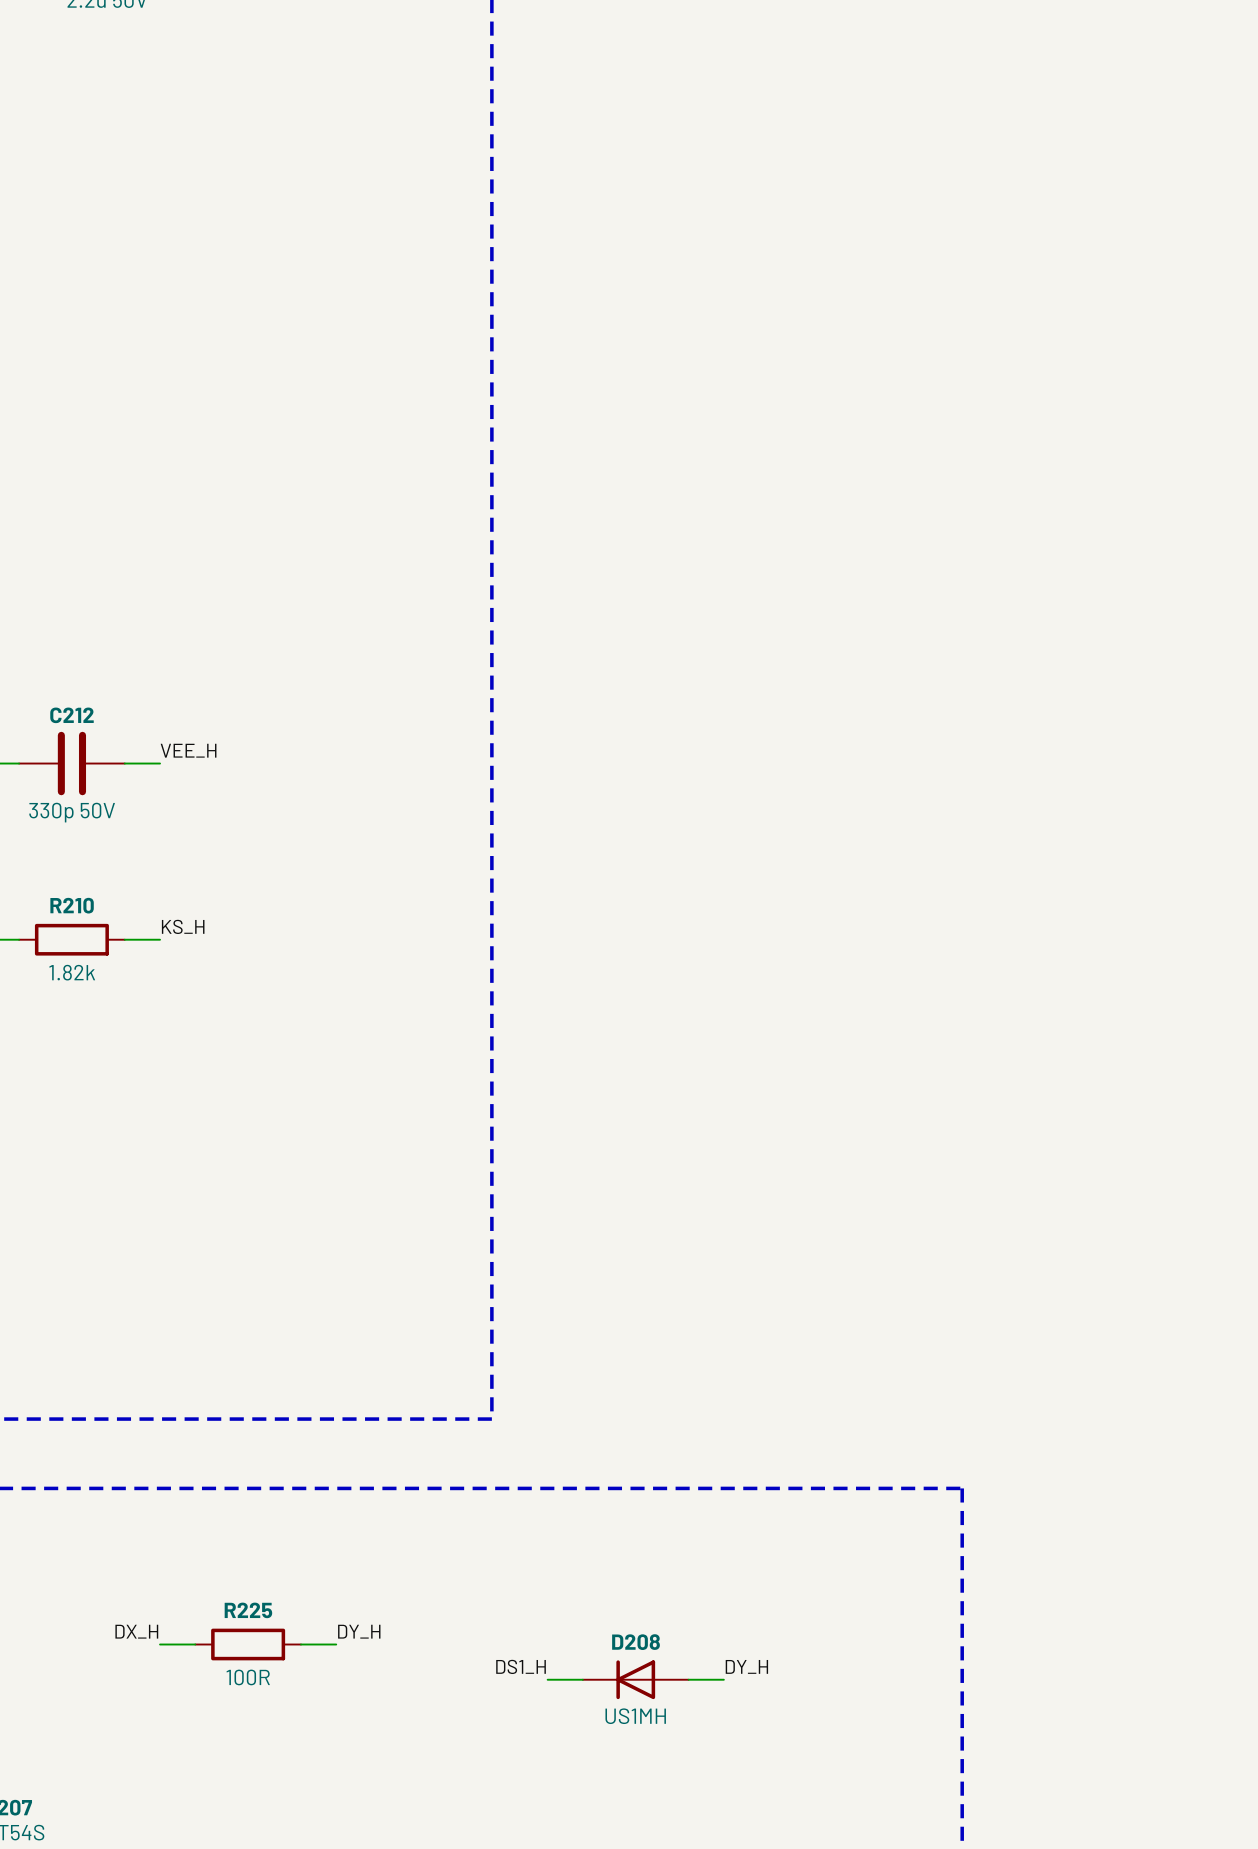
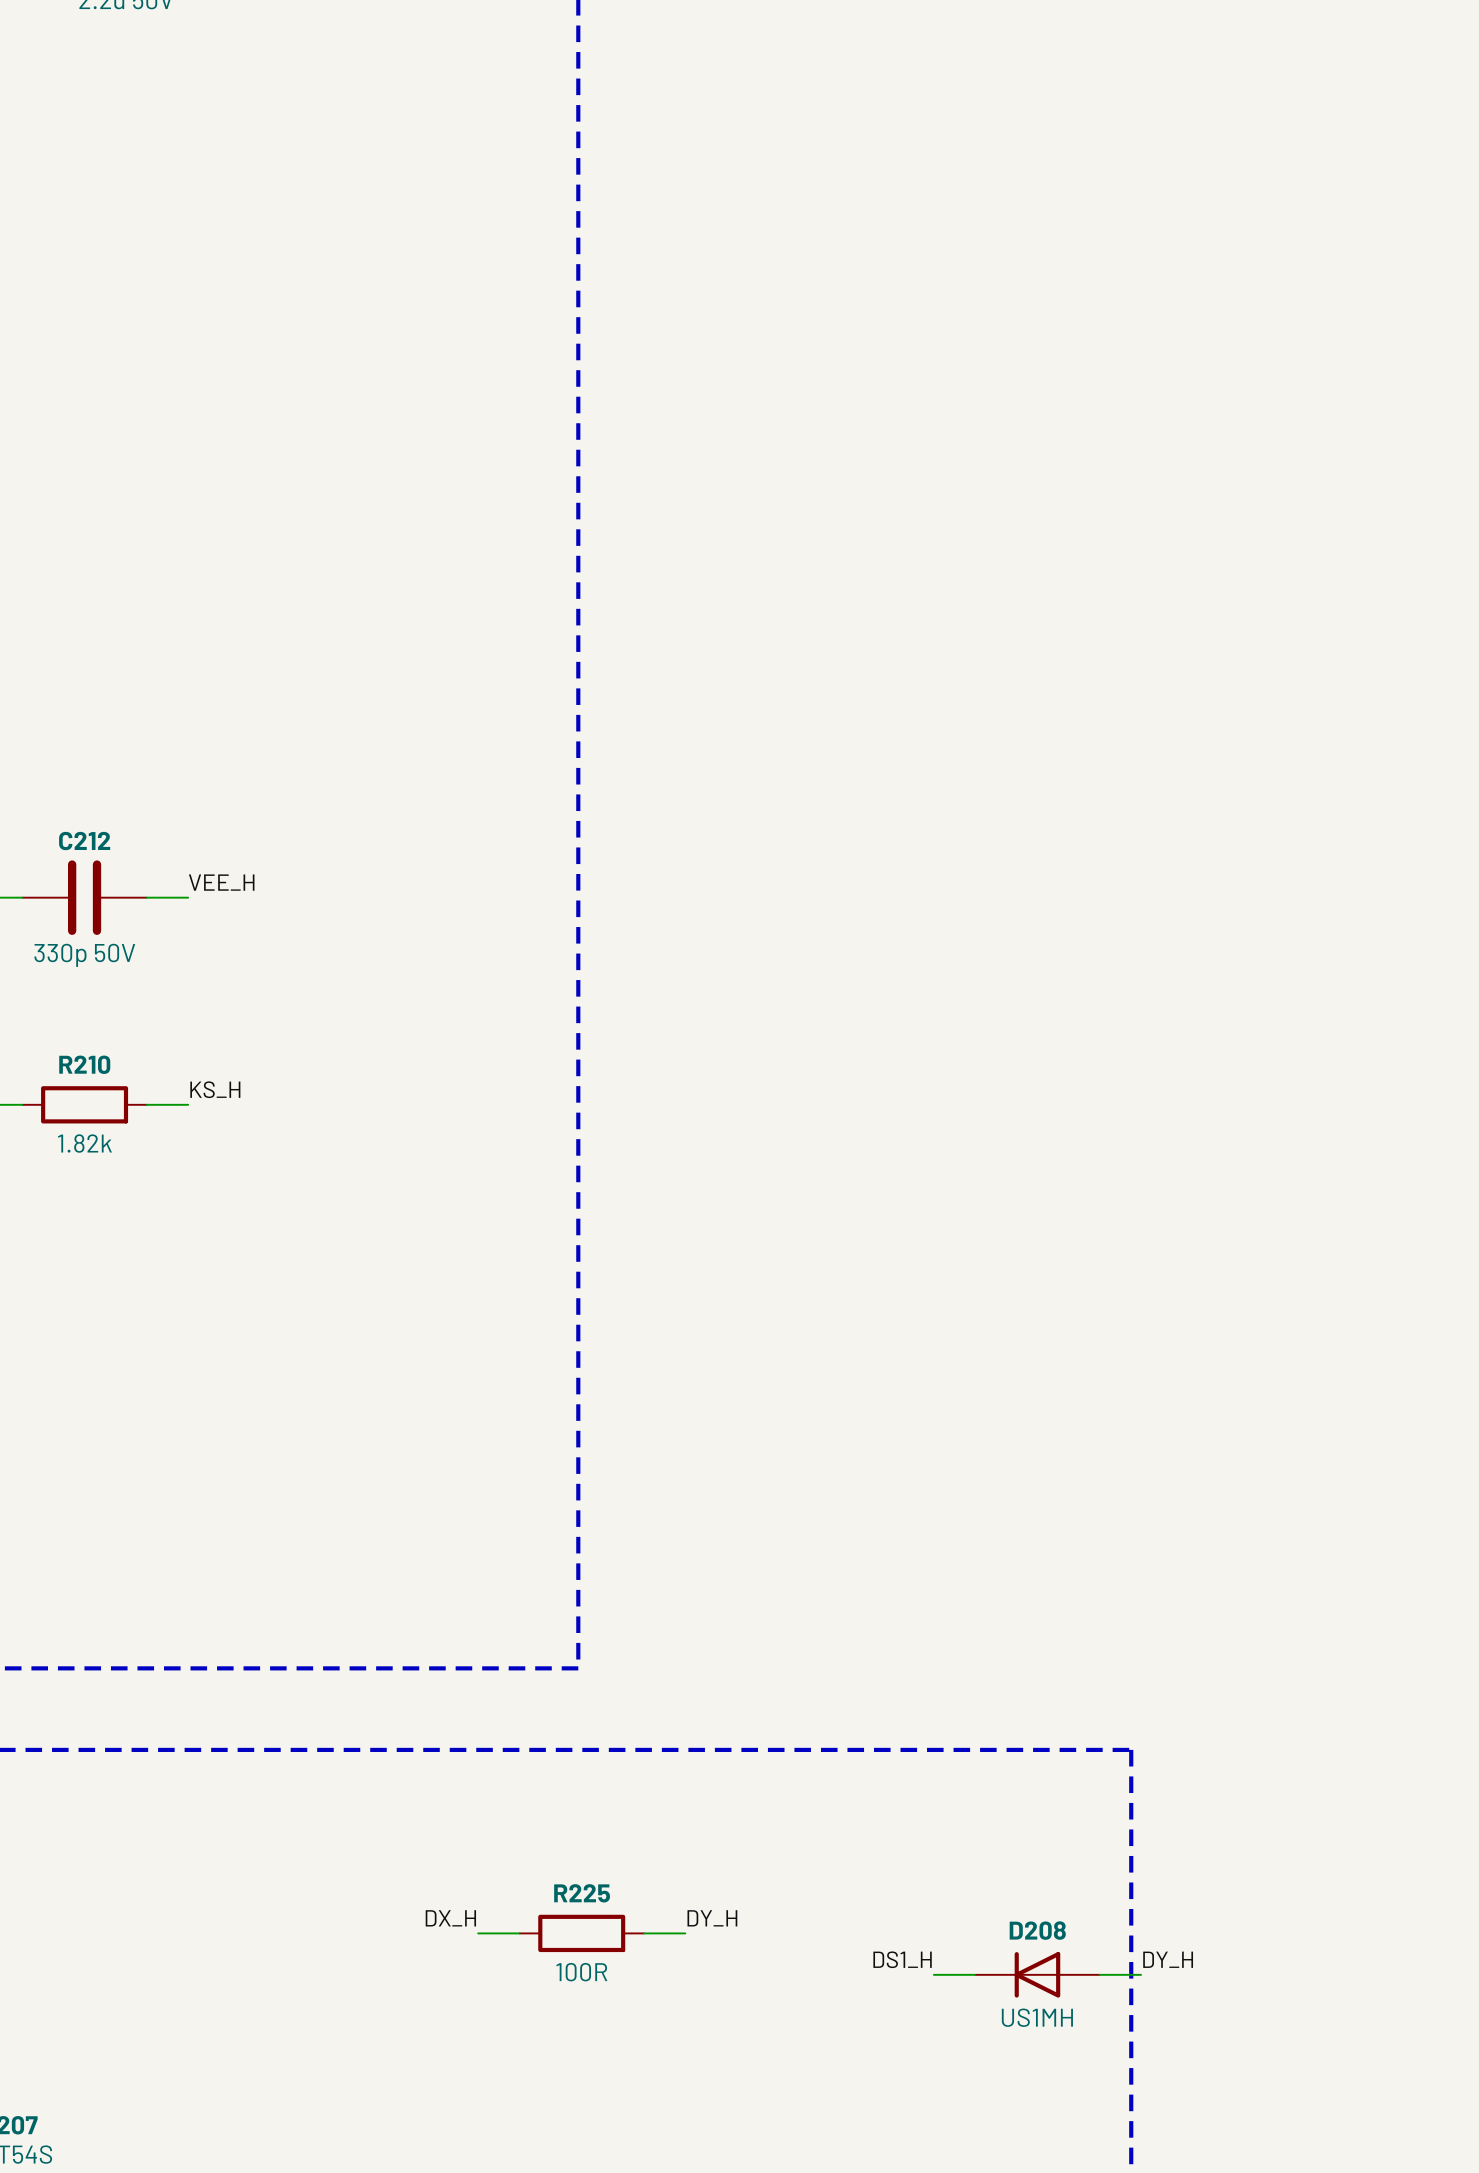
label position: DX_H (136, 1631) -> DX_H (450, 1918)
label: DY_H (359, 1631) -> none
label: none -> DY_H (712, 1918)
wire: (160, 1644) (195, 1644) -> (478, 1933) (519, 1933)
R225 position: (248, 1644) -> (581, 1933)
wire: (300, 1644) (336, 1644) -> (643, 1933) (685, 1933)
label position: DS1_H (521, 1666) -> DS1_H (902, 1959)
label: DY_H (746, 1666) -> none
label: none -> DY_H (1168, 1959)
wire: (547, 1679) (582, 1679) -> (933, 1974) (975, 1974)
D208 position: (635, 1679) -> (1037, 1974)
wire: (688, 1679) (723, 1679) -> (1099, 1974) (1141, 1974)

